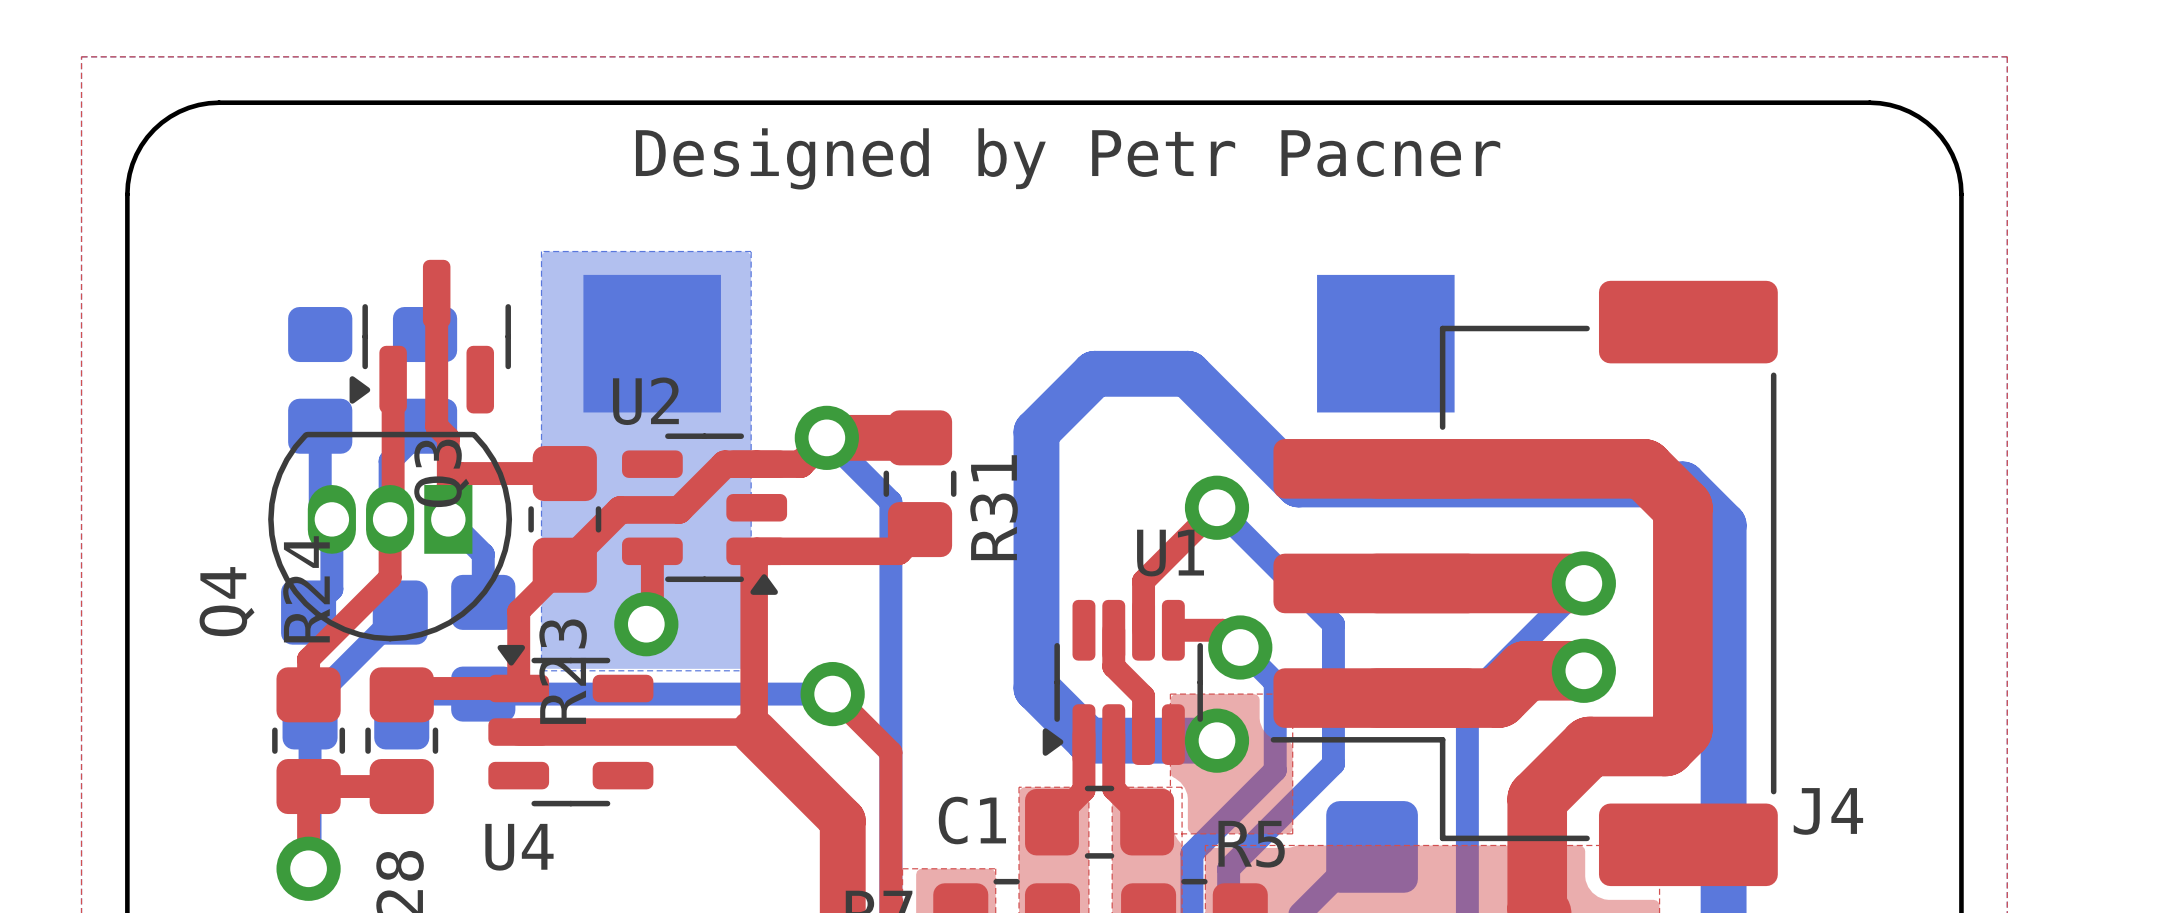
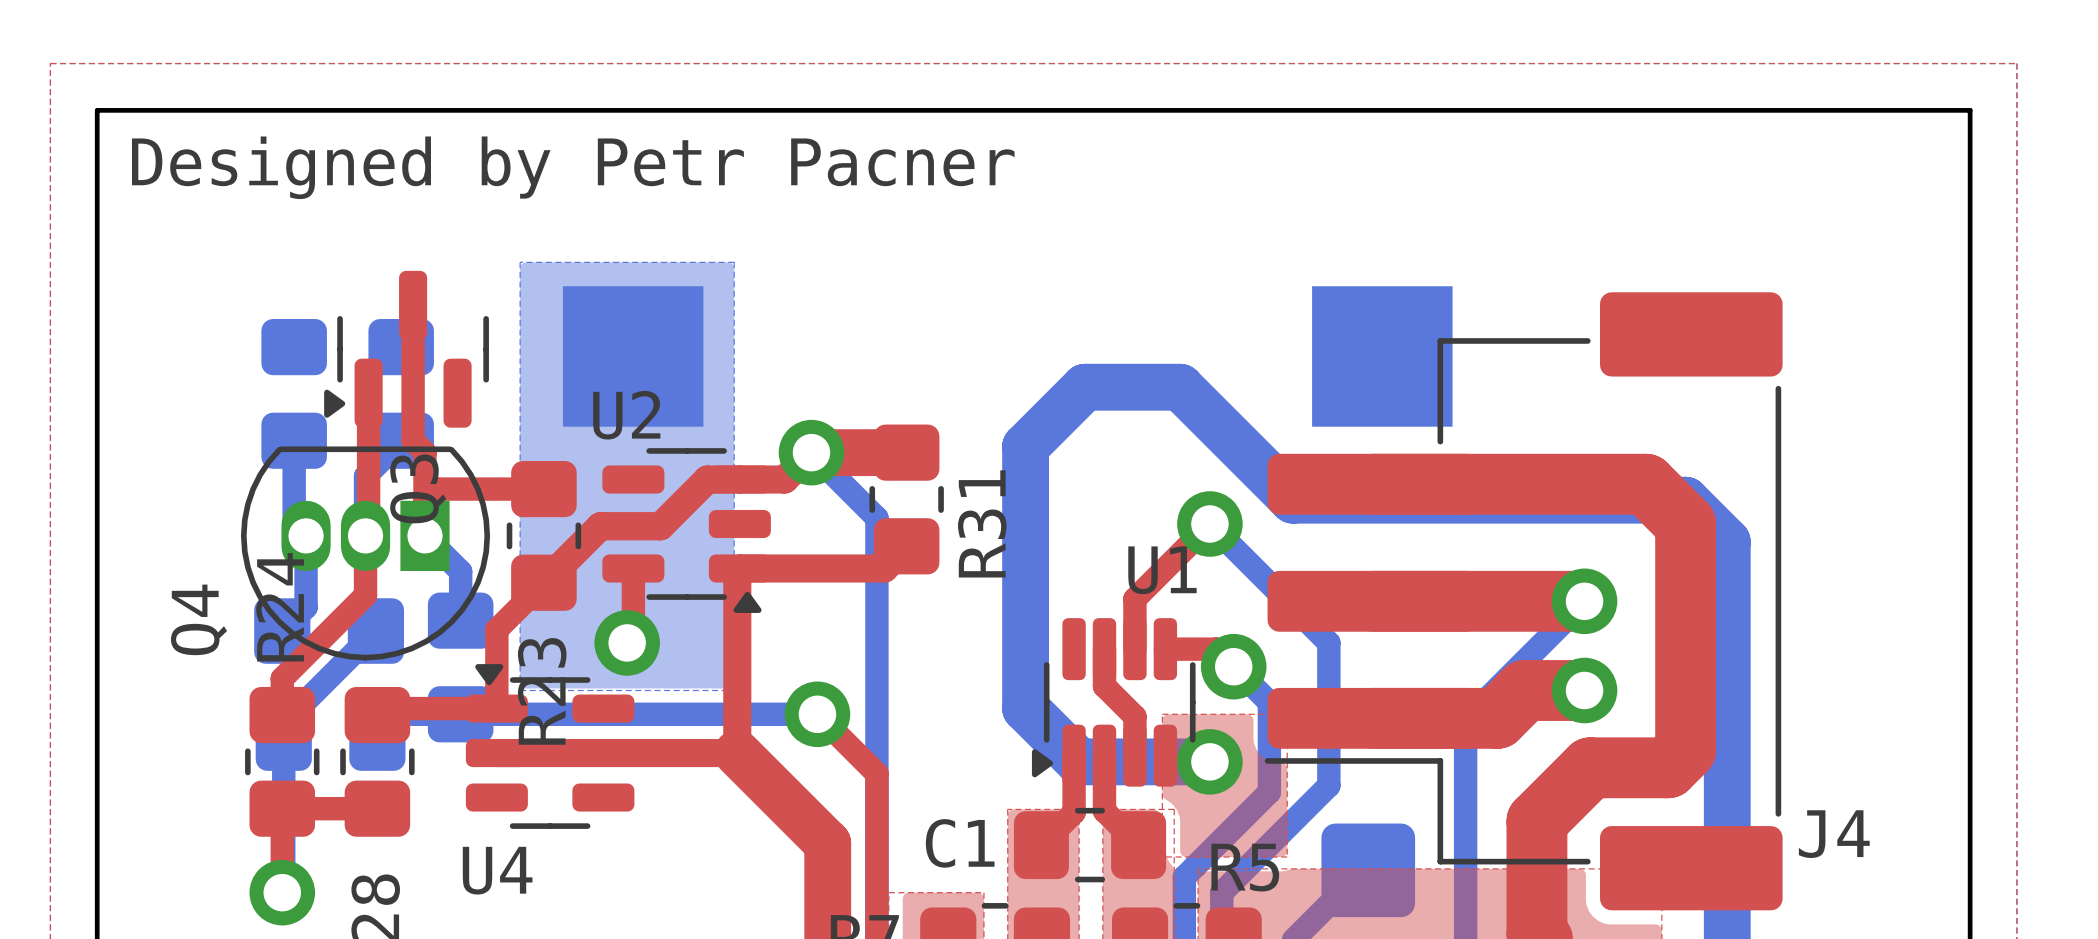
board edge: (219, 102) (188, 107) (170, 116) (154, 129) (136, 154) (129, 173) (127, 194) -> (190, 110) (97, 110) (97, 204)
board edge: (1869, 102) (1890, 104) (1909, 111) (1934, 129) (1947, 145) (1956, 164) (1961, 194) -> (1876, 110) (1970, 110) (1970, 204)
text position: Designed by Petr Pacner (1068, 158) -> Designed by Petr Pacner (573, 167)

